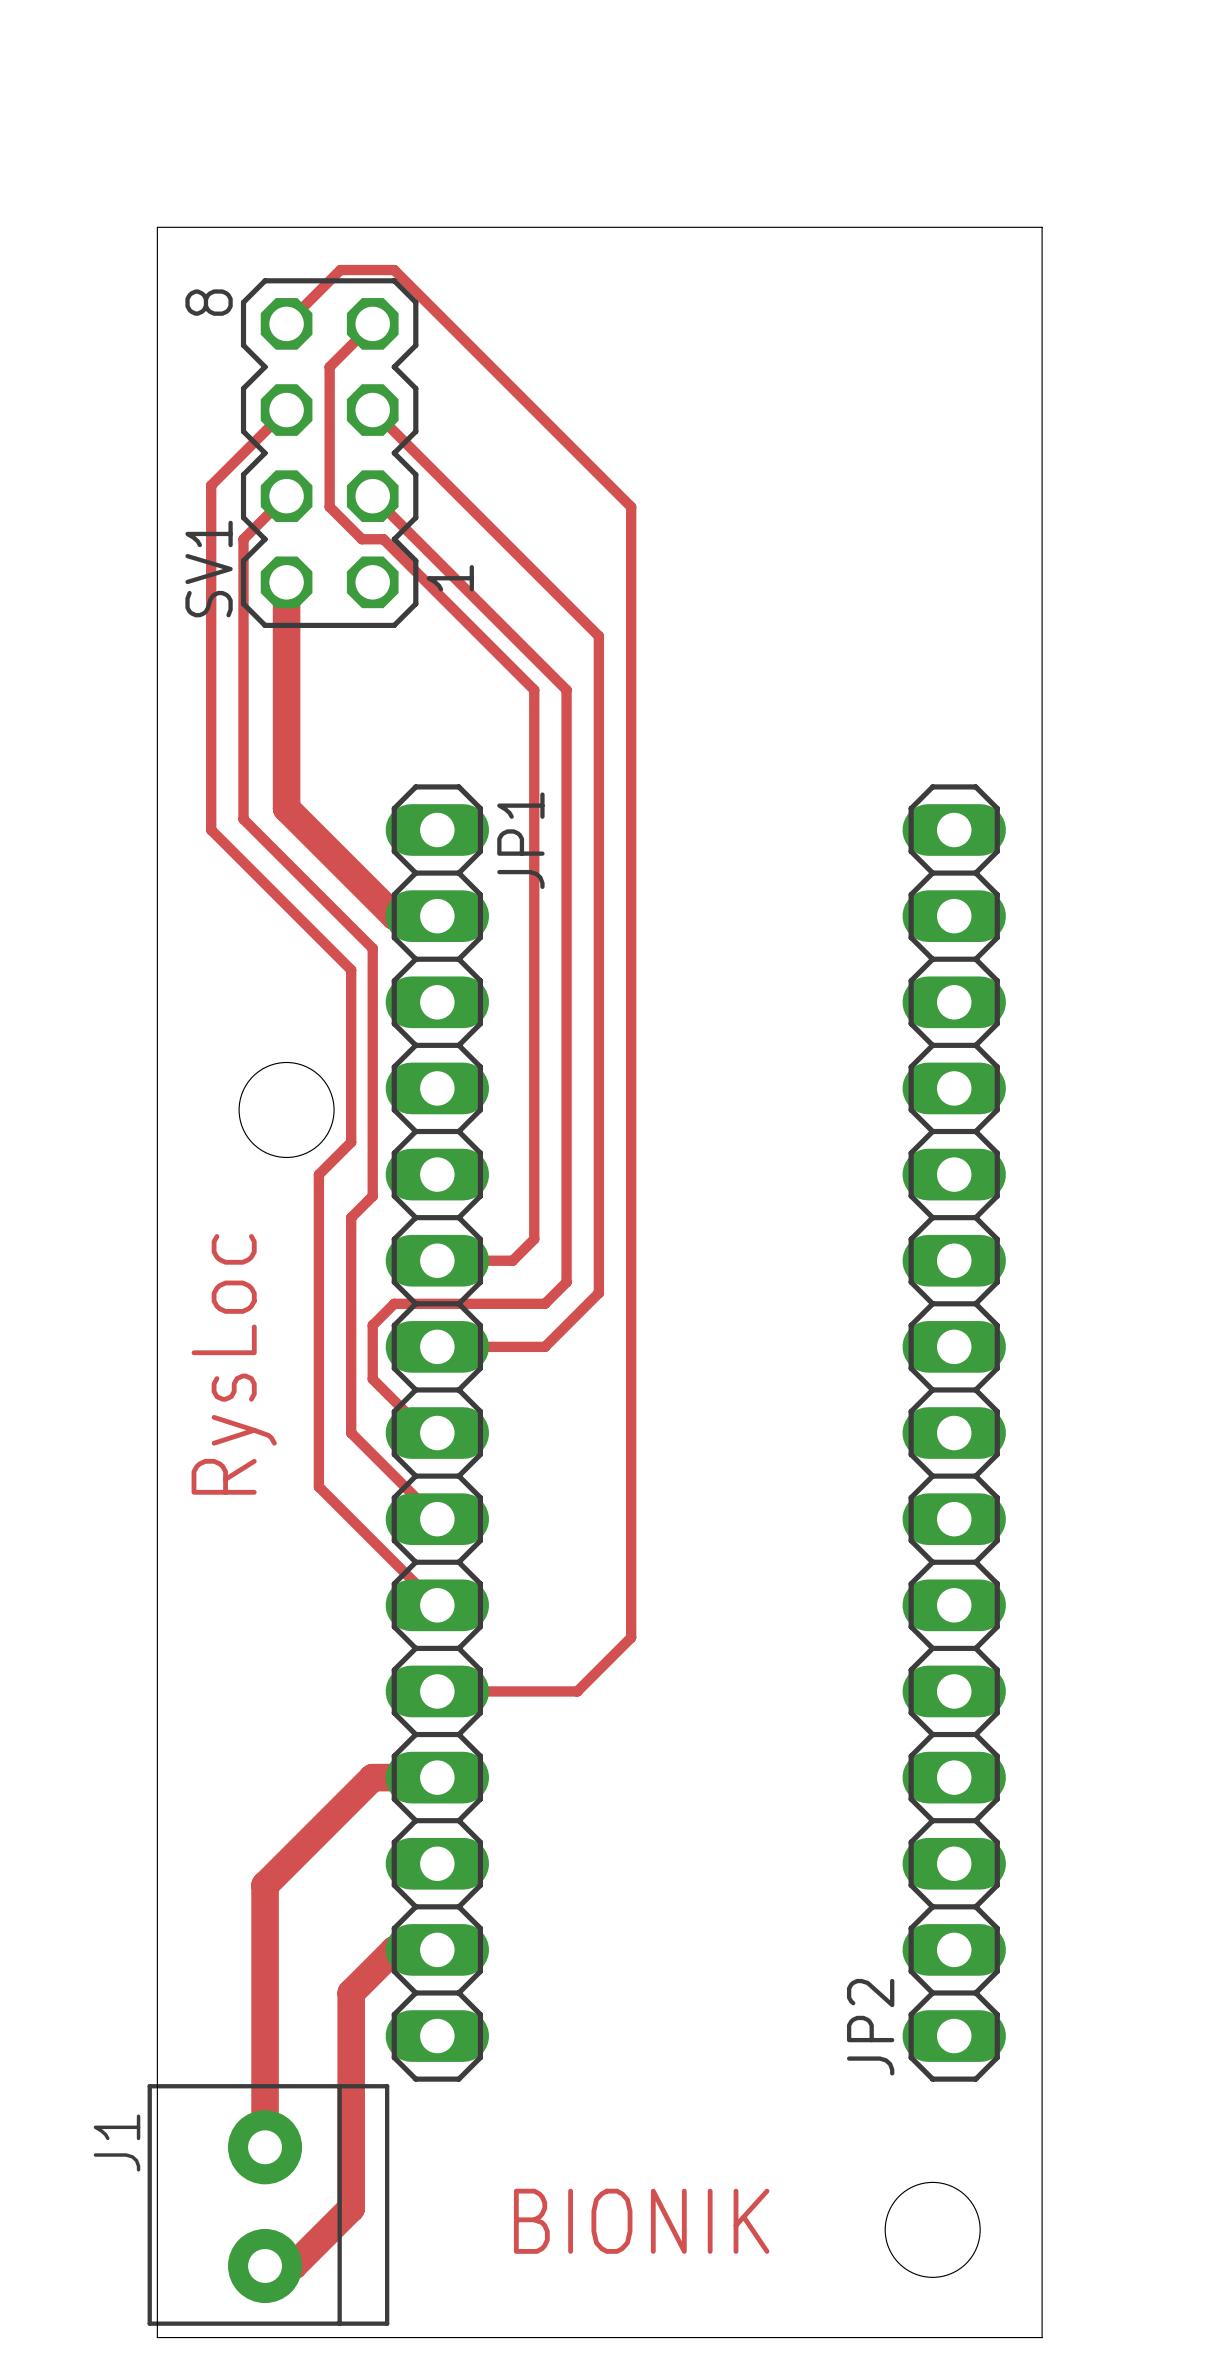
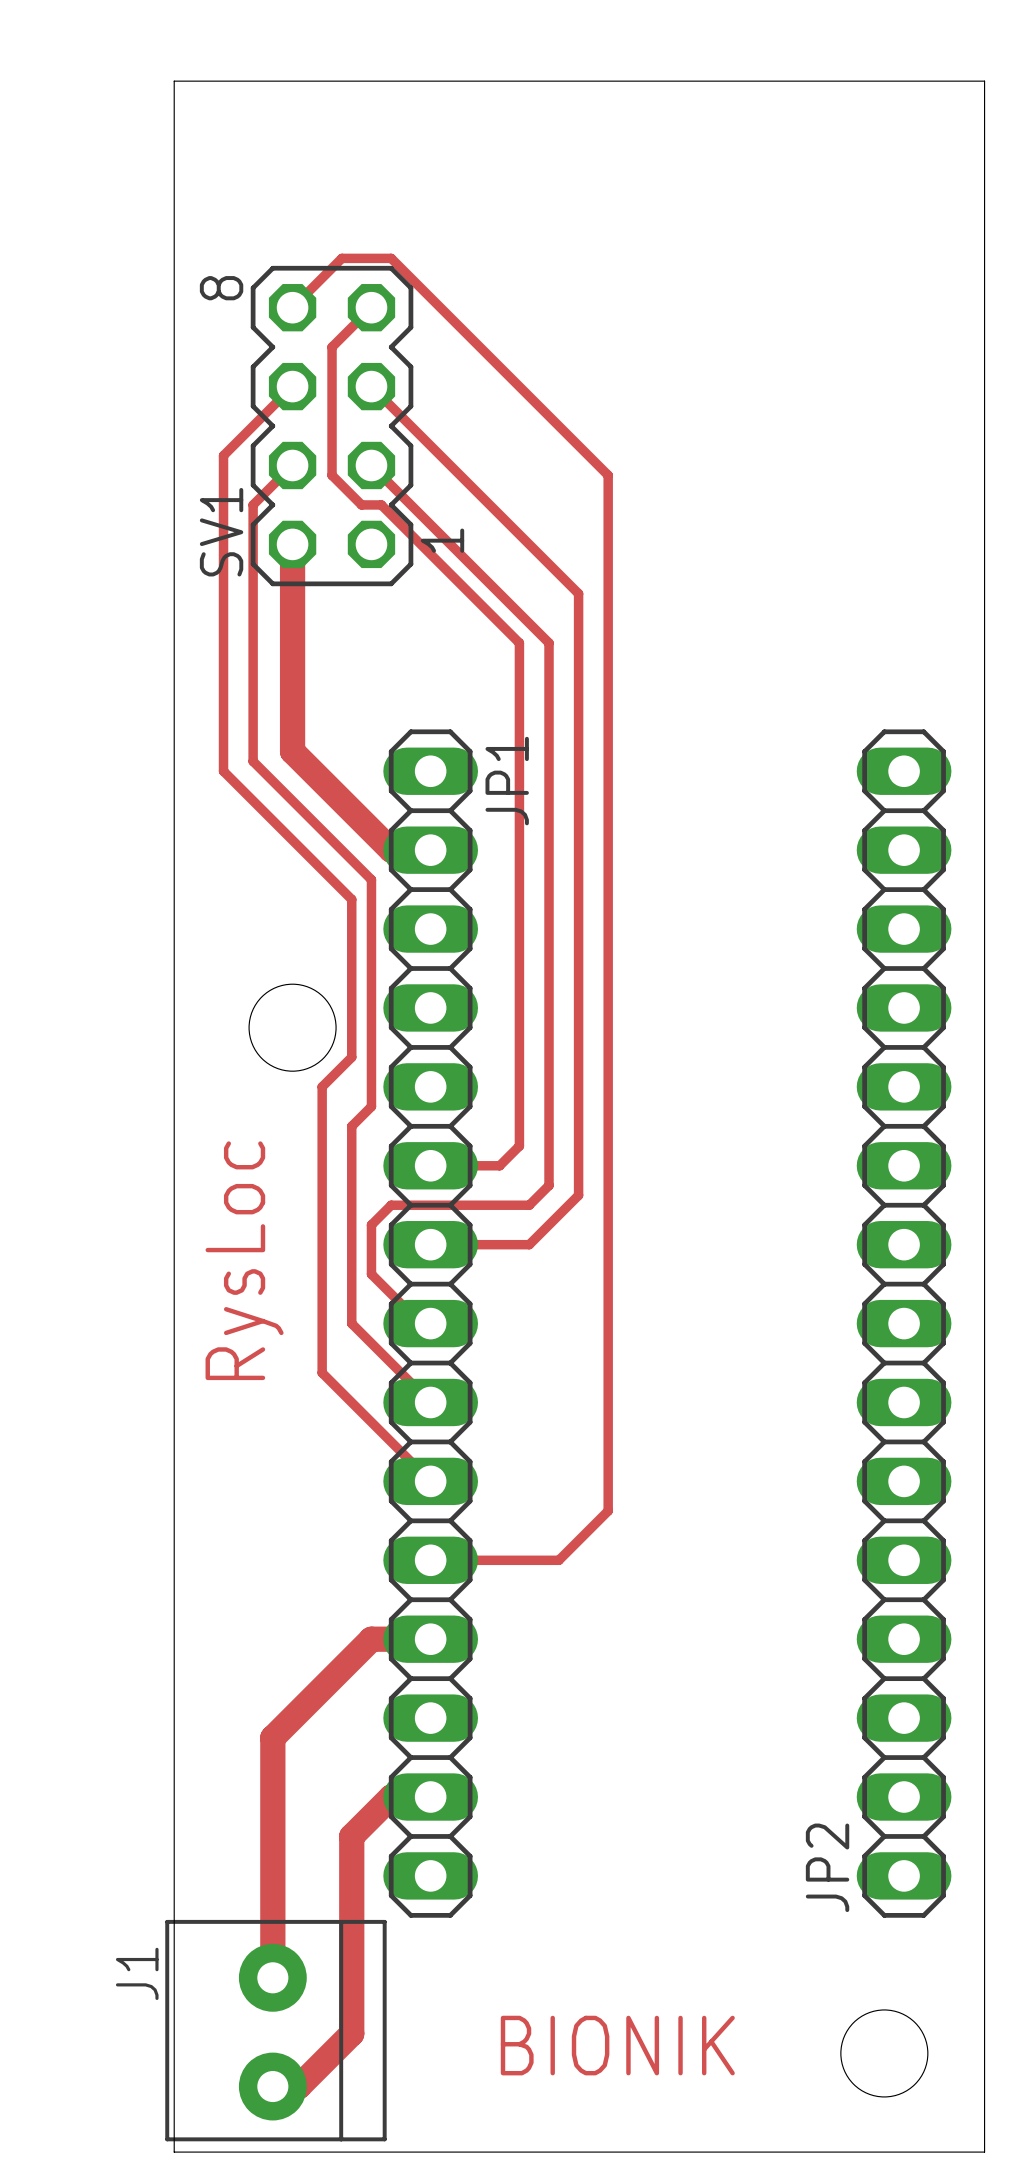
board edge: (157, 227) (1042, 227) -> (174, 219) (174, 81) (984, 81) (984, 219)

